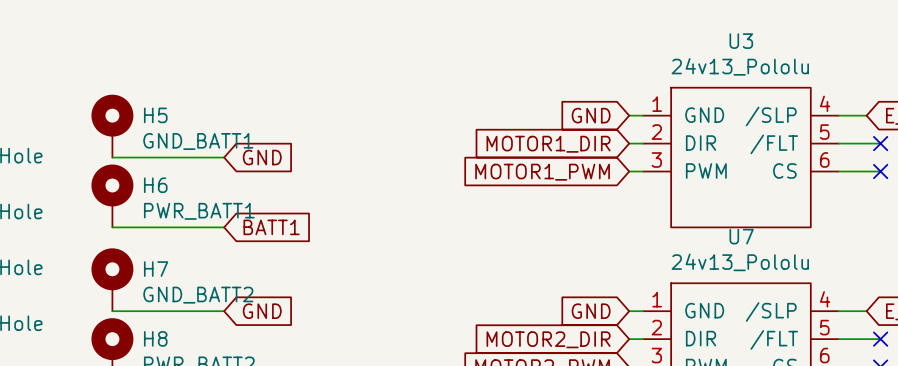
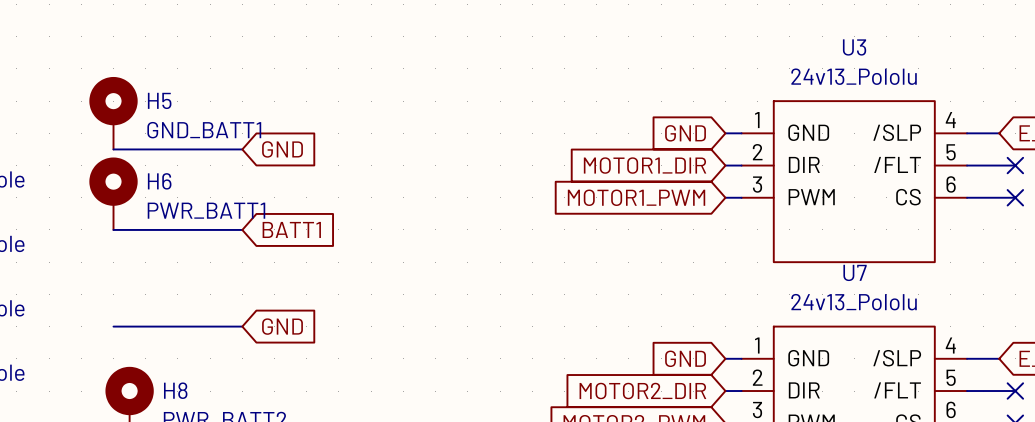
H5 position: (112, 126) -> (113, 113)
wire: (112, 157) (224, 157) -> (113, 149) (242, 149)
global label position: GND (262, 157) -> GND (282, 149)
H6 position: (112, 195) -> (113, 193)
wire: (112, 227) (224, 227) -> (113, 229) (242, 229)
global label position: BATT1 (271, 227) -> BATT1 (291, 229)
H7: GND_BATT2 (112, 279) -> none
wire: (112, 311) (224, 311) -> (113, 326) (242, 326)
global label position: GND (262, 311) -> GND (282, 326)

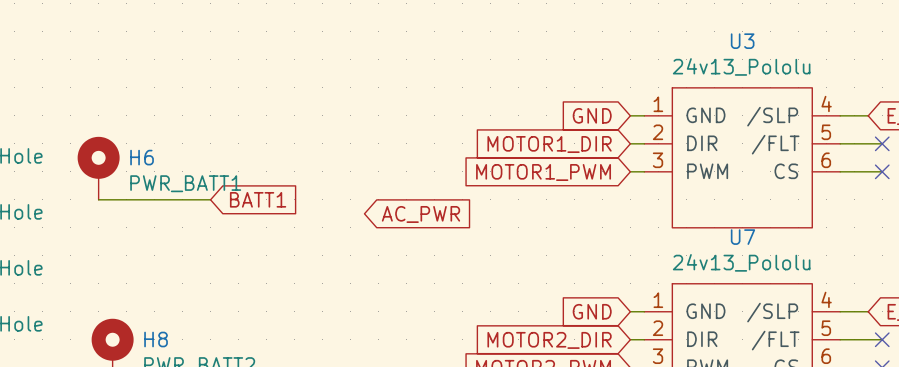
H5: GND_BATT1 (113, 113) -> none
wire: (113, 149) (242, 149) -> none
global label: GND (282, 149) -> none
global label: none -> AC_PWR (420, 214)
wire: (113, 326) (242, 326) -> none
global label: GND (282, 326) -> none

